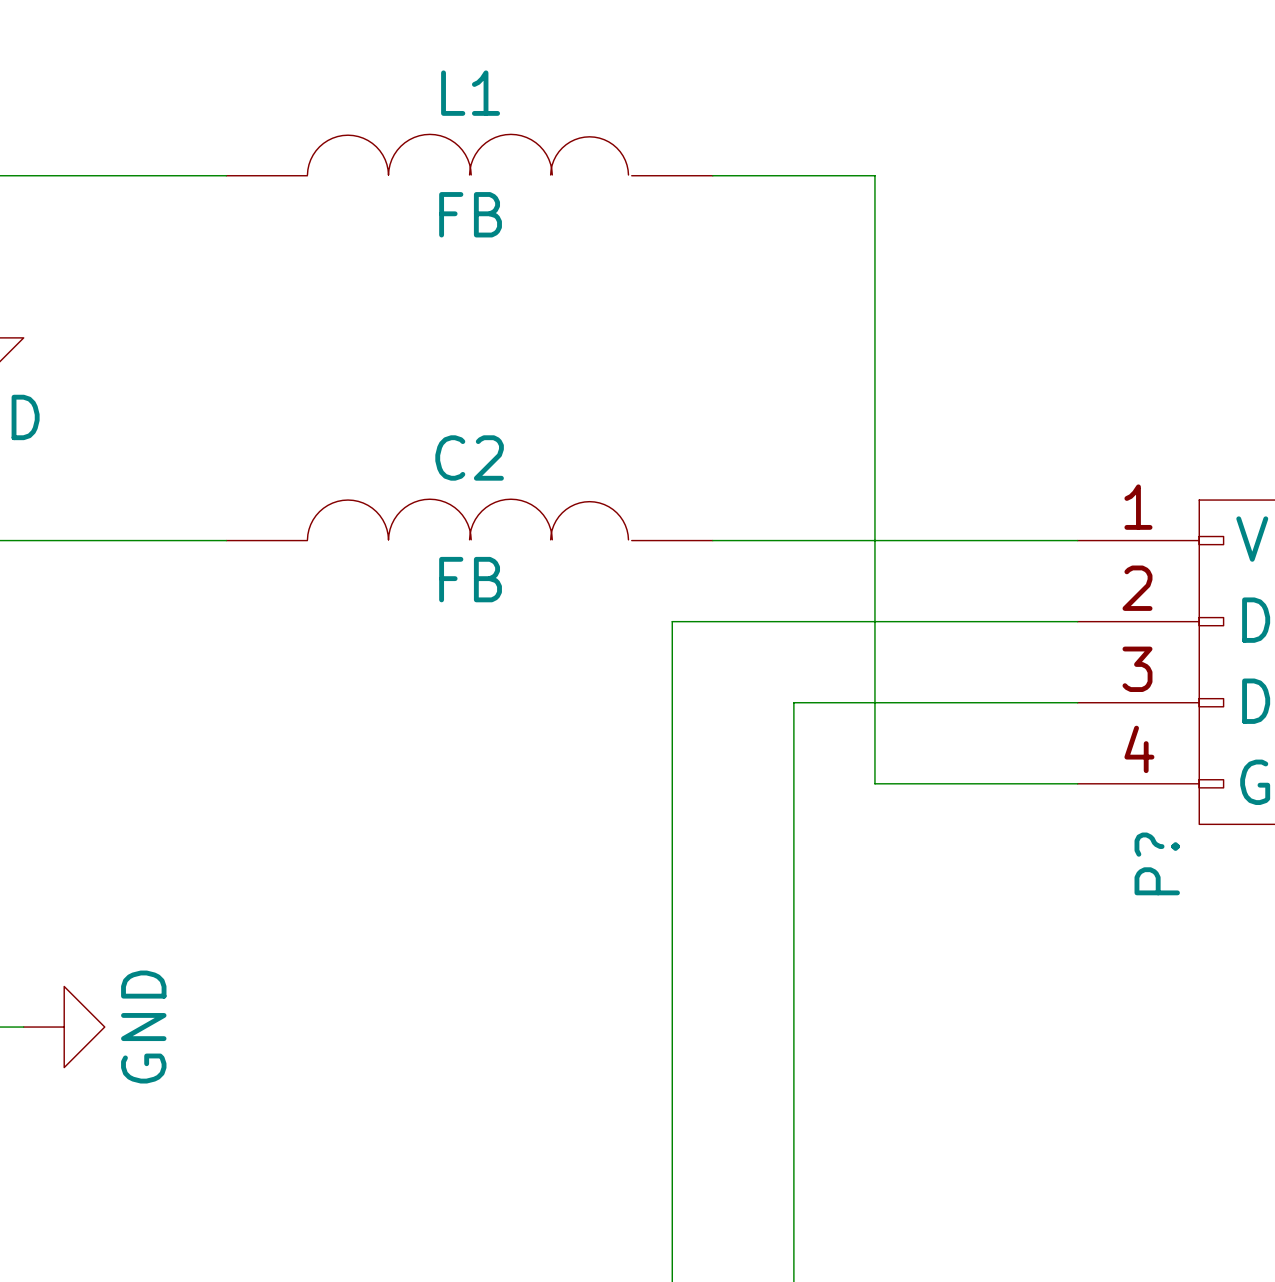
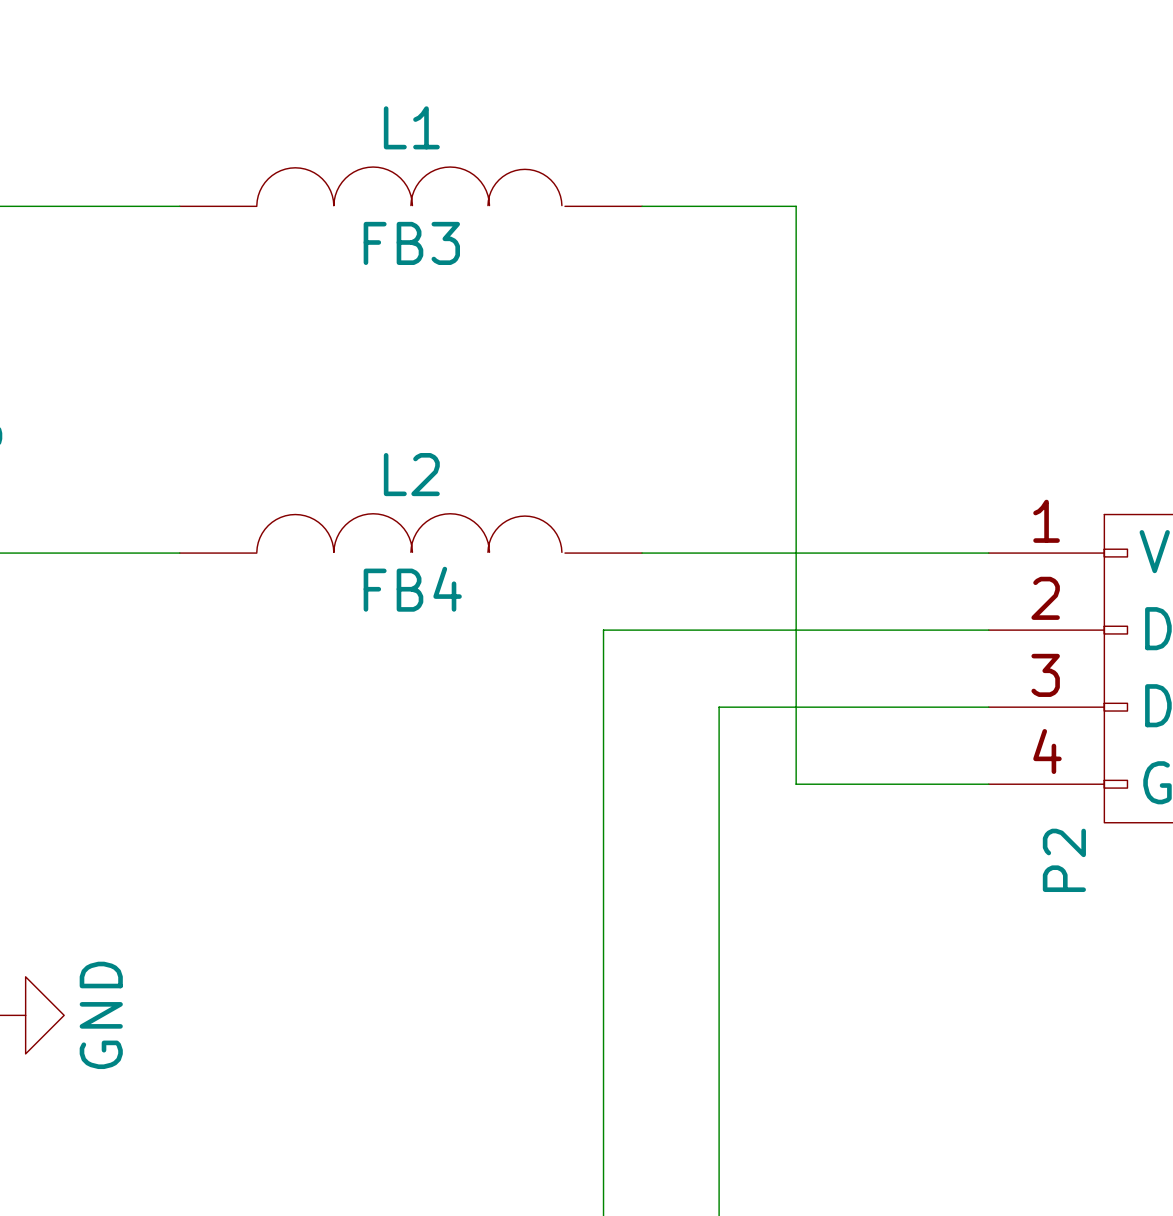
FB name: FB (470, 214) -> FB3 (411, 243)
FB value: C2 (469, 457) -> L2 (411, 474)
FB name: FB (470, 579) -> FB4 (412, 589)
P? name: P? (1157, 863) -> P2 (1064, 860)

